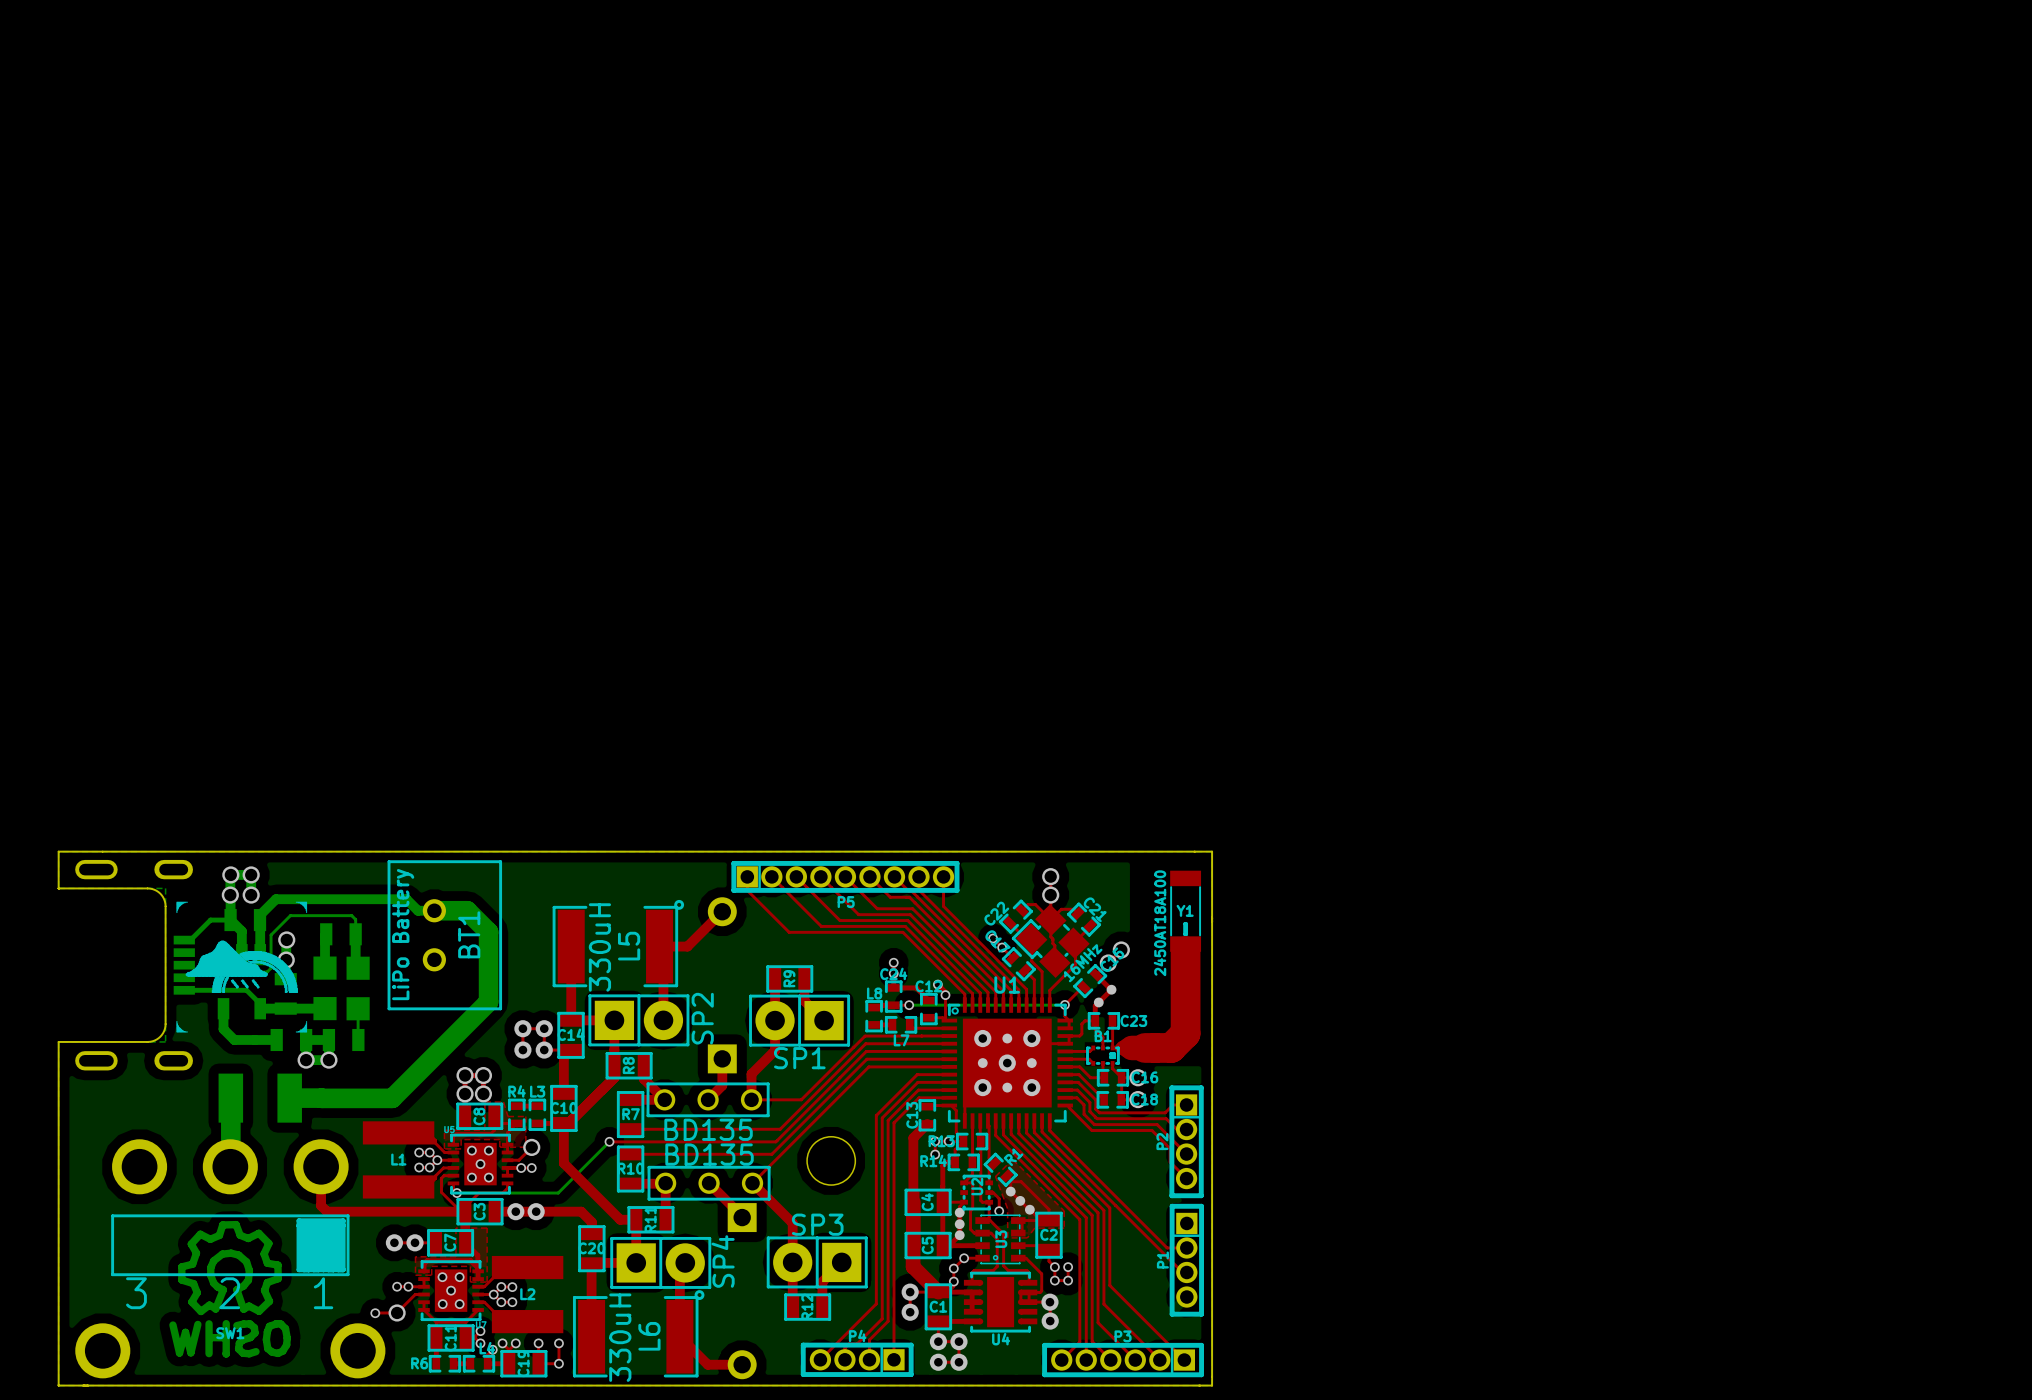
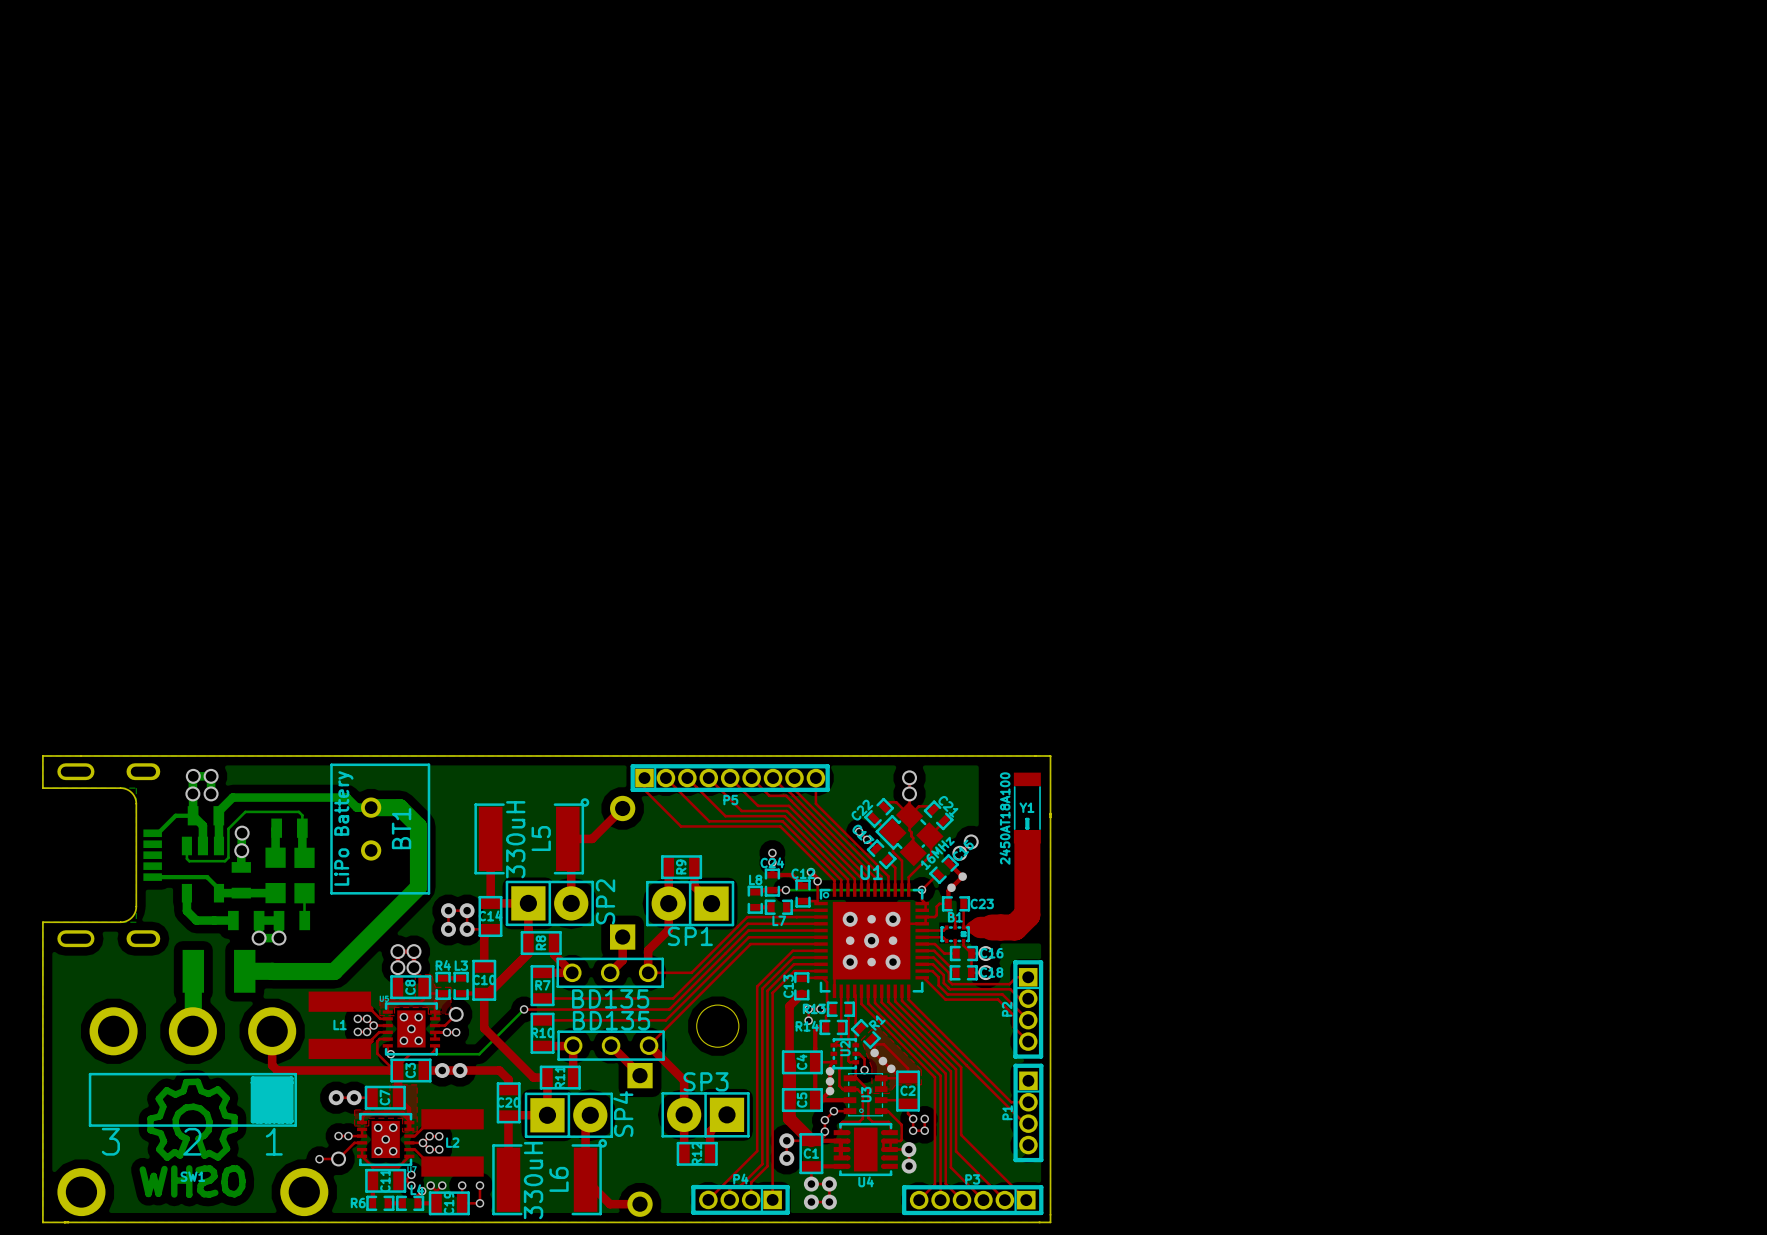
drawing: [176, 901, 308, 1033] -> none

